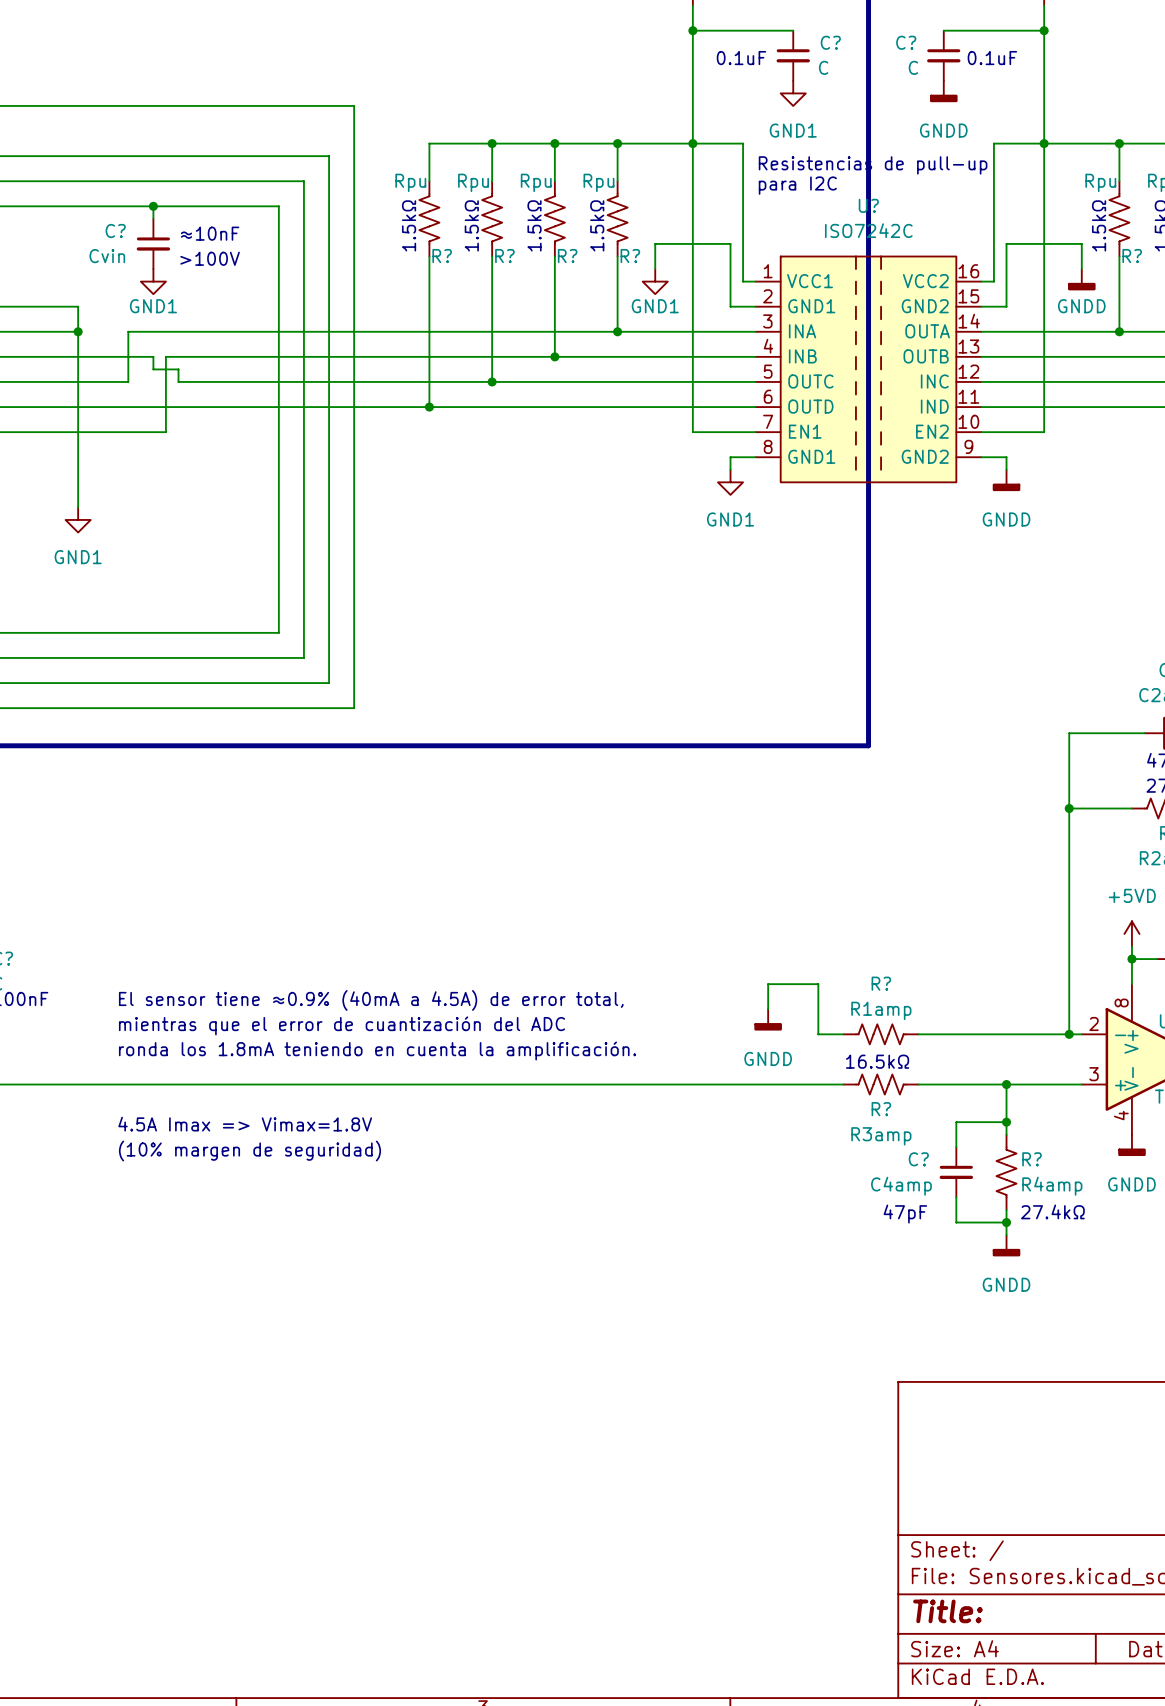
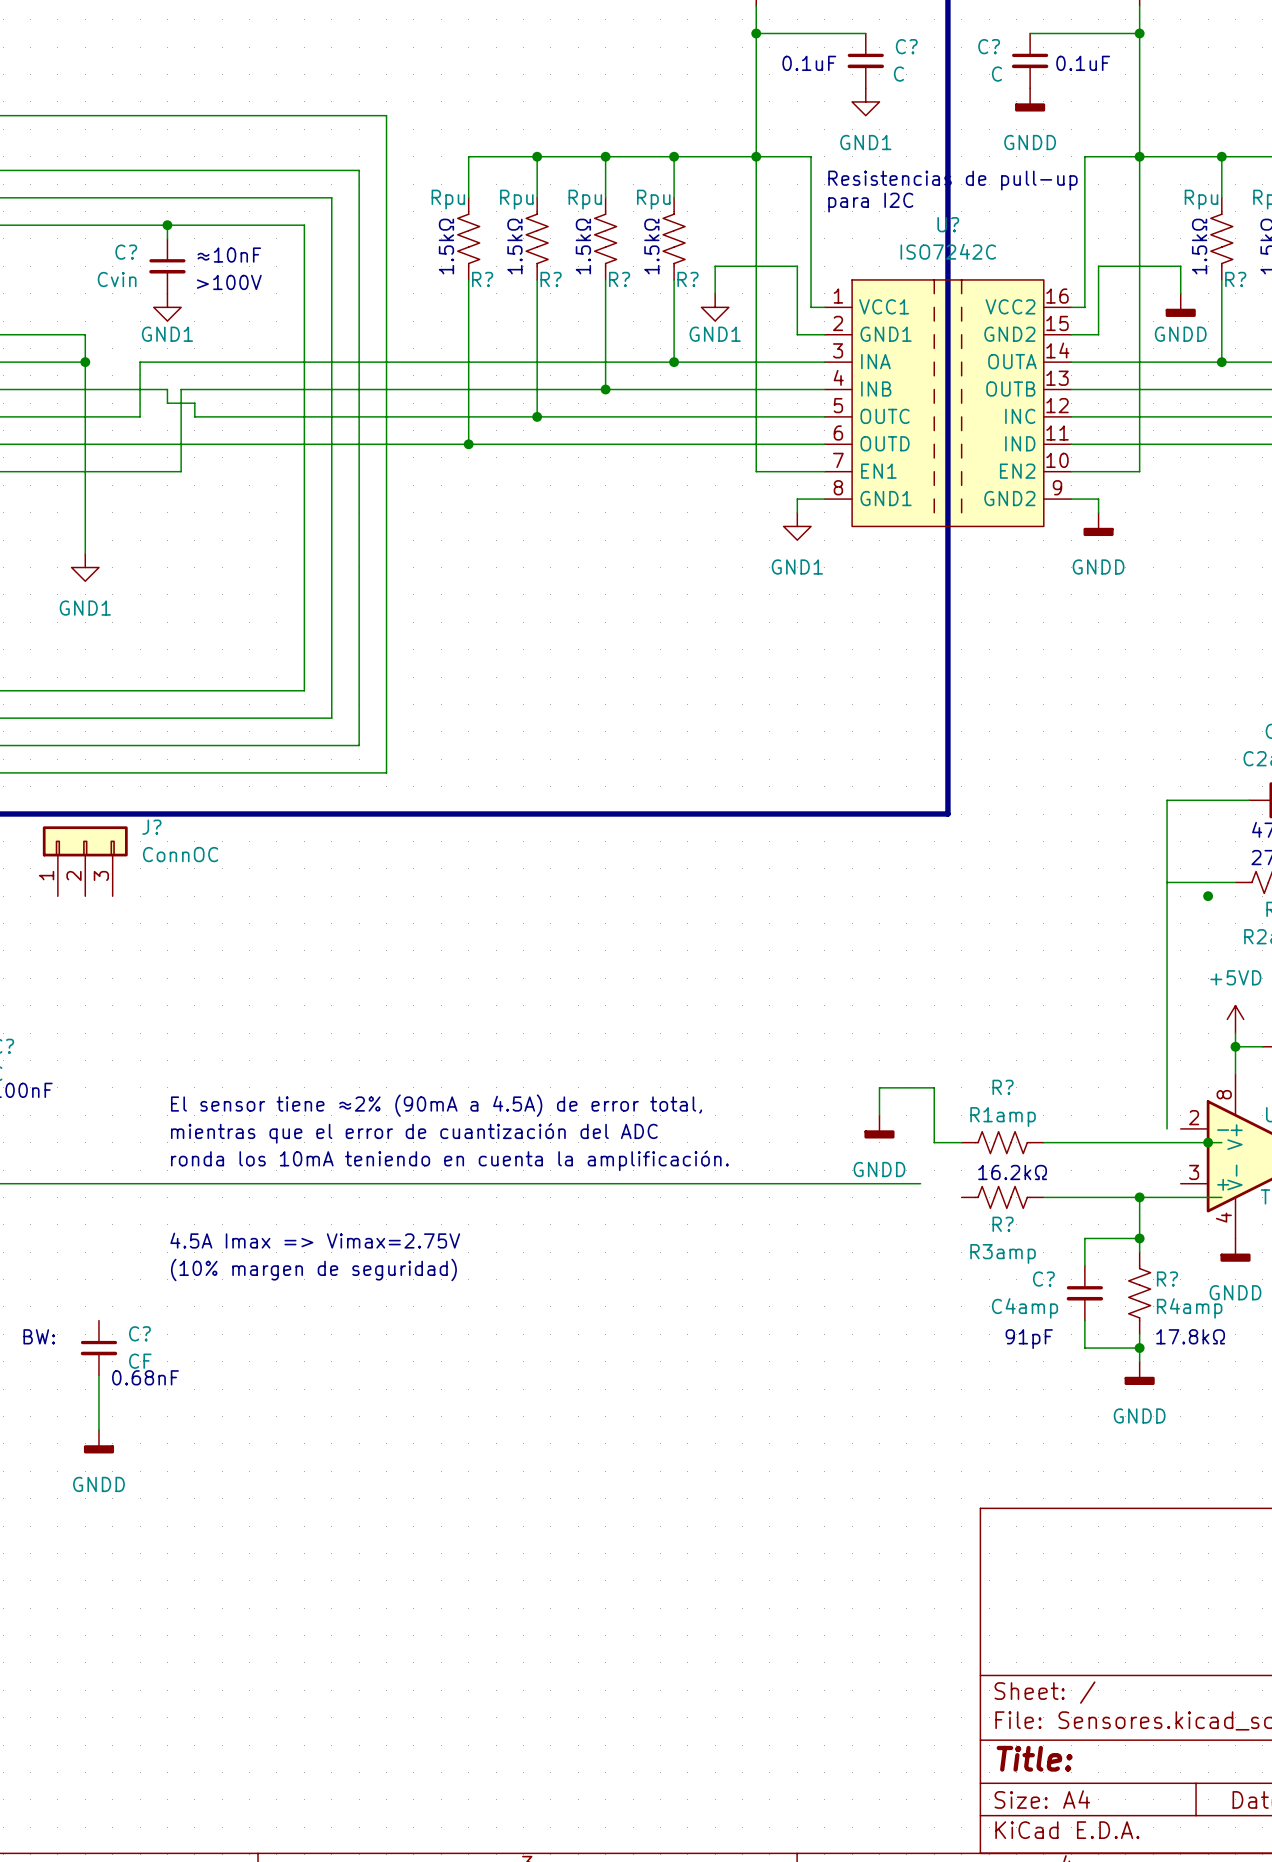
J?: none -> ConnOC (85, 861)
junction position: (1069, 808) -> (1208, 896)
text: El sensor tiene ≈0.9% (40mA a 4.5A) de error total, (371, 1000) -> El sensor tiene ≈2% (90mA a 4.5A) de error total, (436, 1105)
wire: (768, 1009) (768, 984) (818, 984) (818, 1034) (843, 1034) -> (879, 1115) (879, 1087) (934, 1087) (934, 1142) (961, 1142)
power symbol position: GNDD (768, 1019) -> GNDD (879, 1126)
text position: mientras que el error de cuantización del ADC (341, 1025) -> mientras que el error de cuantización del ADC (414, 1133)
R? position: (881, 1034) -> (1002, 1142)
wire: (918, 1034) (1081, 1034) -> (1043, 1142) (1221, 1142)
junction: (1069, 1034) -> none
junction: none -> (1208, 1142)
text: ronda los 1.8mA teniendo en cuenta la amplificación. (377, 1050) -> ronda los 10mA teniendo en cuenta la amplificación. (449, 1160)
text: 16.5kΩ (877, 1061) -> 16.2kΩ (1012, 1172)
R? position: (881, 1084) -> (1002, 1197)
wire: (918, 1084) (1081, 1084) -> (1043, 1197) (1221, 1197)
wire: (1006, 1084) (1006, 1134) -> (1139, 1197) (1139, 1252)
junction: (1006, 1084) -> none
junction: none -> (1139, 1197)
wire: (1006, 1122) (956, 1122) (956, 1147) -> (1139, 1238) (1084, 1238) (1084, 1265)
junction: (1006, 1122) -> none
text: 4.5A Imax => Vimax=1.8V (245, 1124) -> 4.5A Imax => Vimax=2.75V (315, 1240)
junction: none -> (1139, 1238)
text position: (10% margen de seguridad) (249, 1151) -> (10% margen de seguridad) (313, 1269)
C? position: (956, 1172) -> (1084, 1293)
R? position: (1006, 1172) -> (1139, 1293)
wire: (956, 1197) (956, 1222) (1006, 1222) -> (1084, 1320) (1084, 1348) (1139, 1348)
wire: (1006, 1209) (1006, 1235) -> (1139, 1334) (1139, 1361)
text: 27.4kΩ (1052, 1211) -> 17.8kΩ (1190, 1336)
text: 47pF (905, 1214) -> none
junction position: (1006, 1222) -> (1139, 1348)
text: none -> BW: (39, 1336)
text: none -> 91pF (1029, 1339)
C?: none -> CF (98, 1348)
power symbol position: GNDD (1006, 1245) -> GNDD (1139, 1373)
wire: none -> (98, 1375) (98, 1430)
text: none -> 0.68nF (145, 1377)
power symbol: none -> GNDD (98, 1441)

